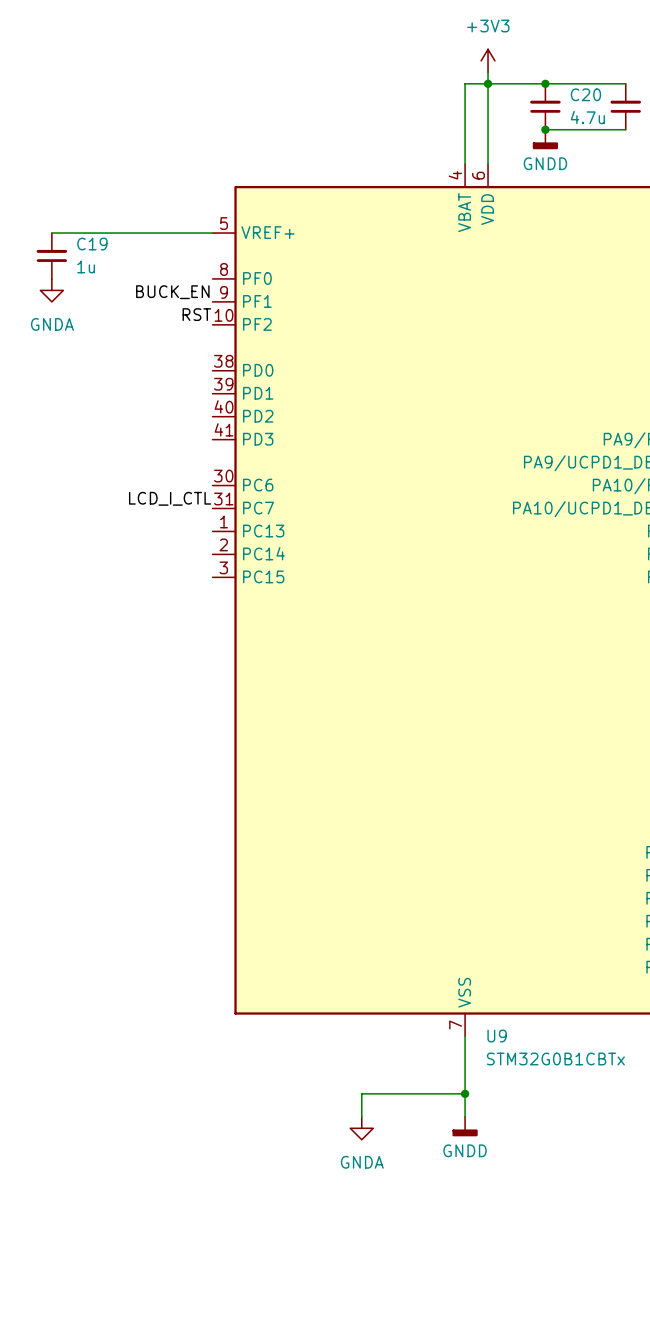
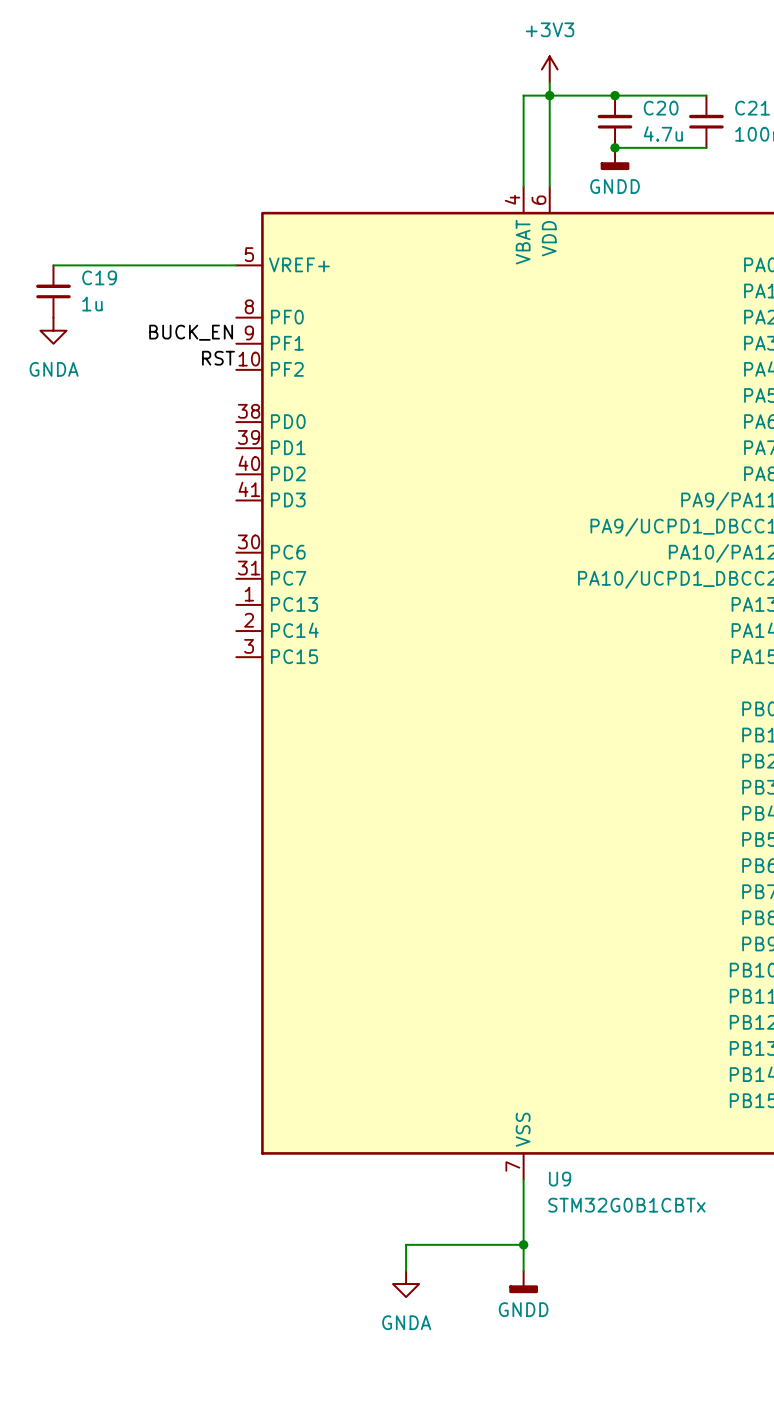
label: LCD_I_CTL (170, 498) -> none

